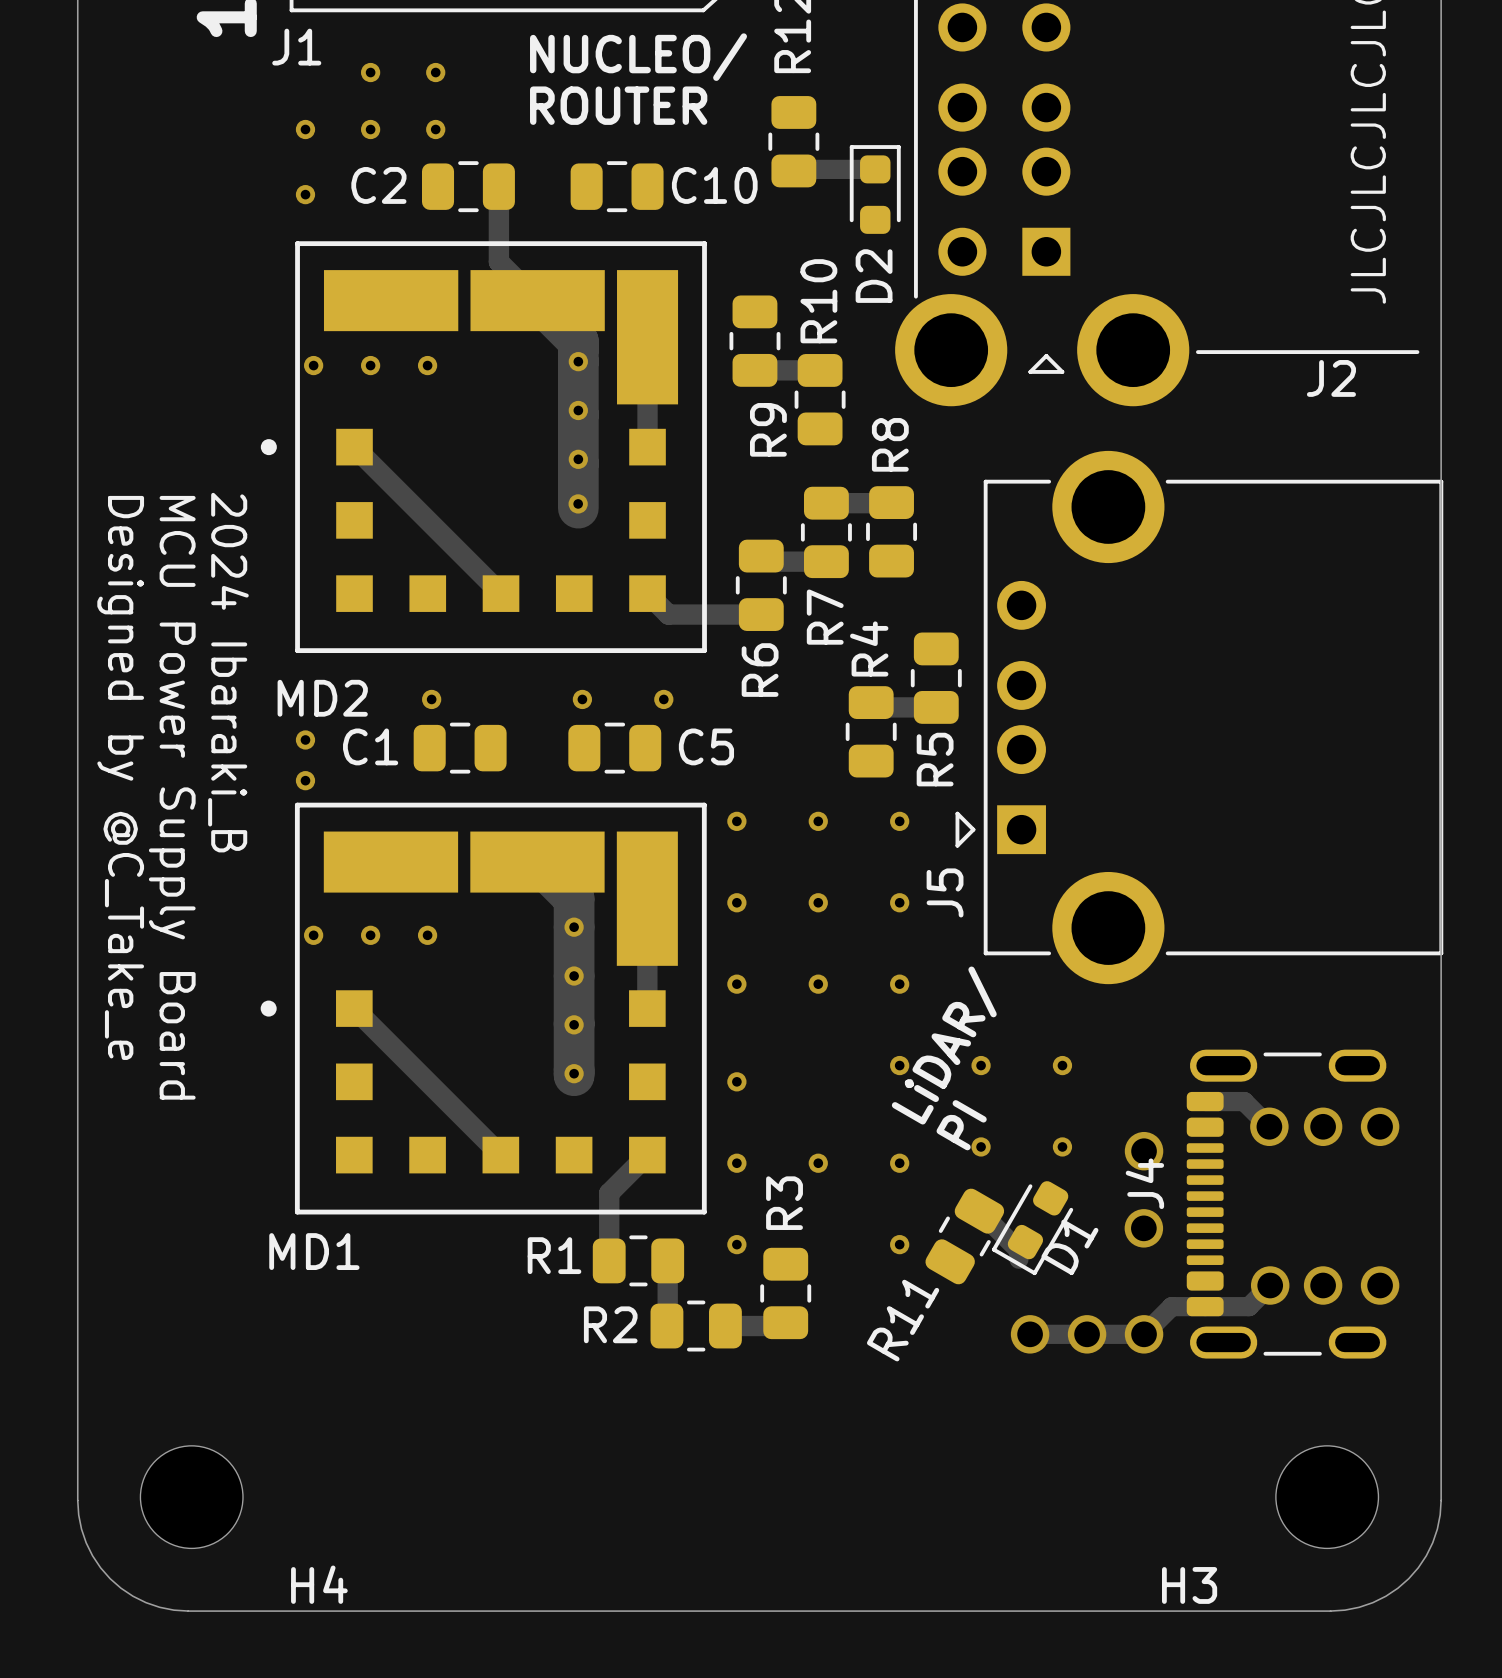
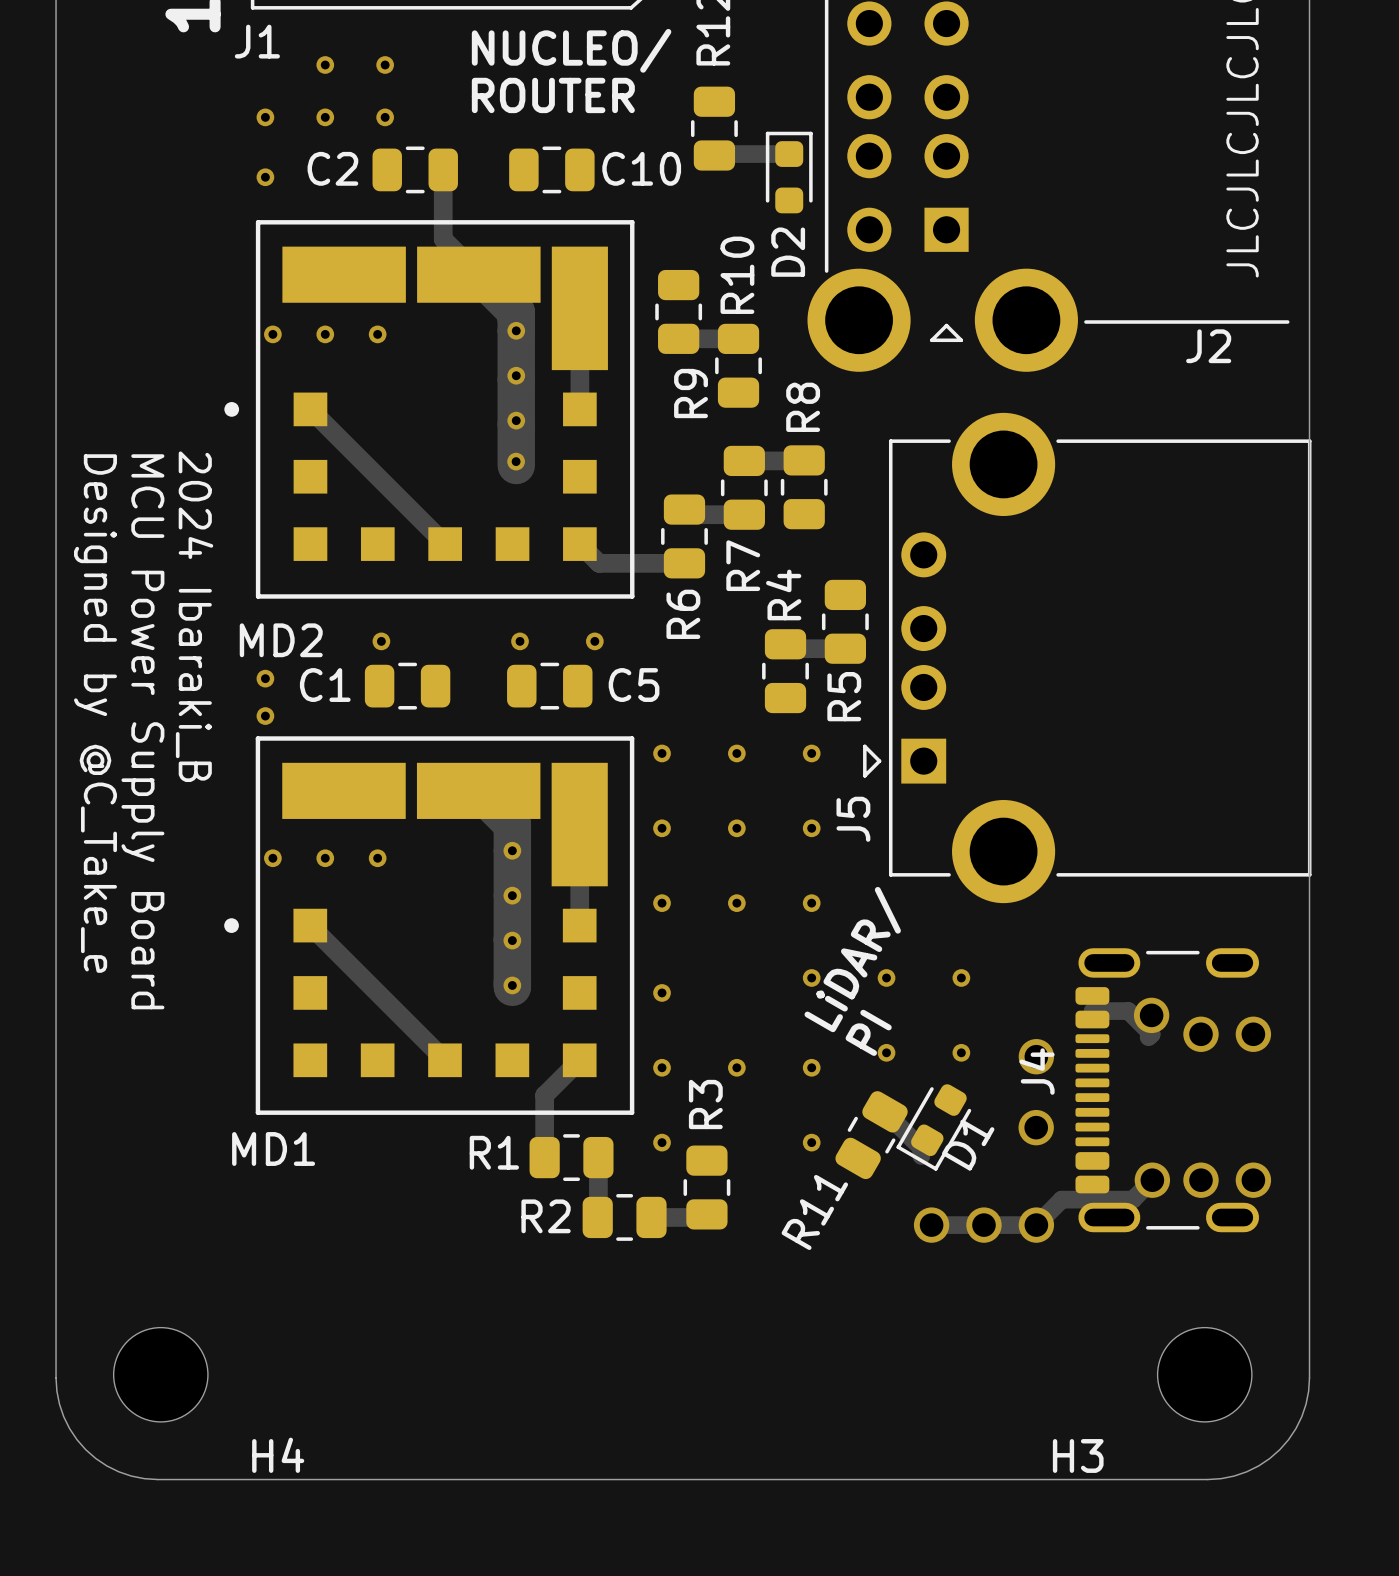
via position: (1269, 1126) -> (1151, 1015)
J4 position: (1286, 1204) -> (1167, 1090)

